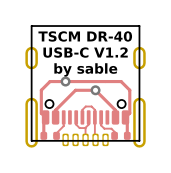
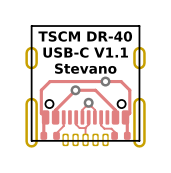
text: USB-C V1.2 (85, 52) -> USB-C V1.1 (85, 52)
text: by sable (85, 69) -> Stevano (85, 68)
via: (65, 81) -> none
via: none -> (105, 81)
via: none -> (75, 90)
via: (95, 90) -> none
via: none -> (88, 102)
track: (94, 117) (95, 139) -> none

